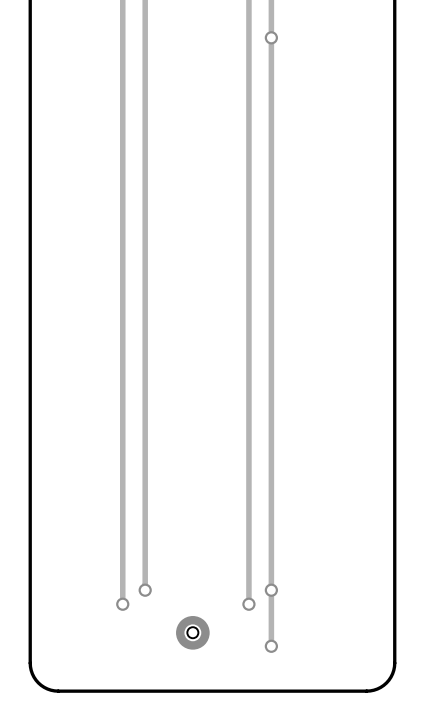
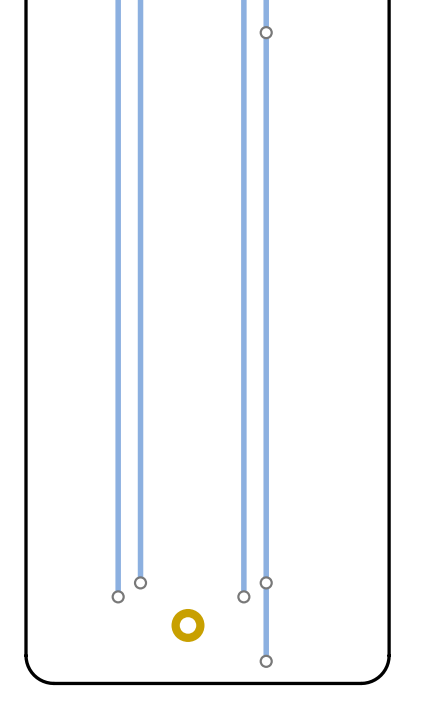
part footprint: [176, 616, 210, 650] -> [171, 608, 205, 642]
track: none -> (266, 638) (266, 661)
via position: (271, 646) -> (266, 661)

